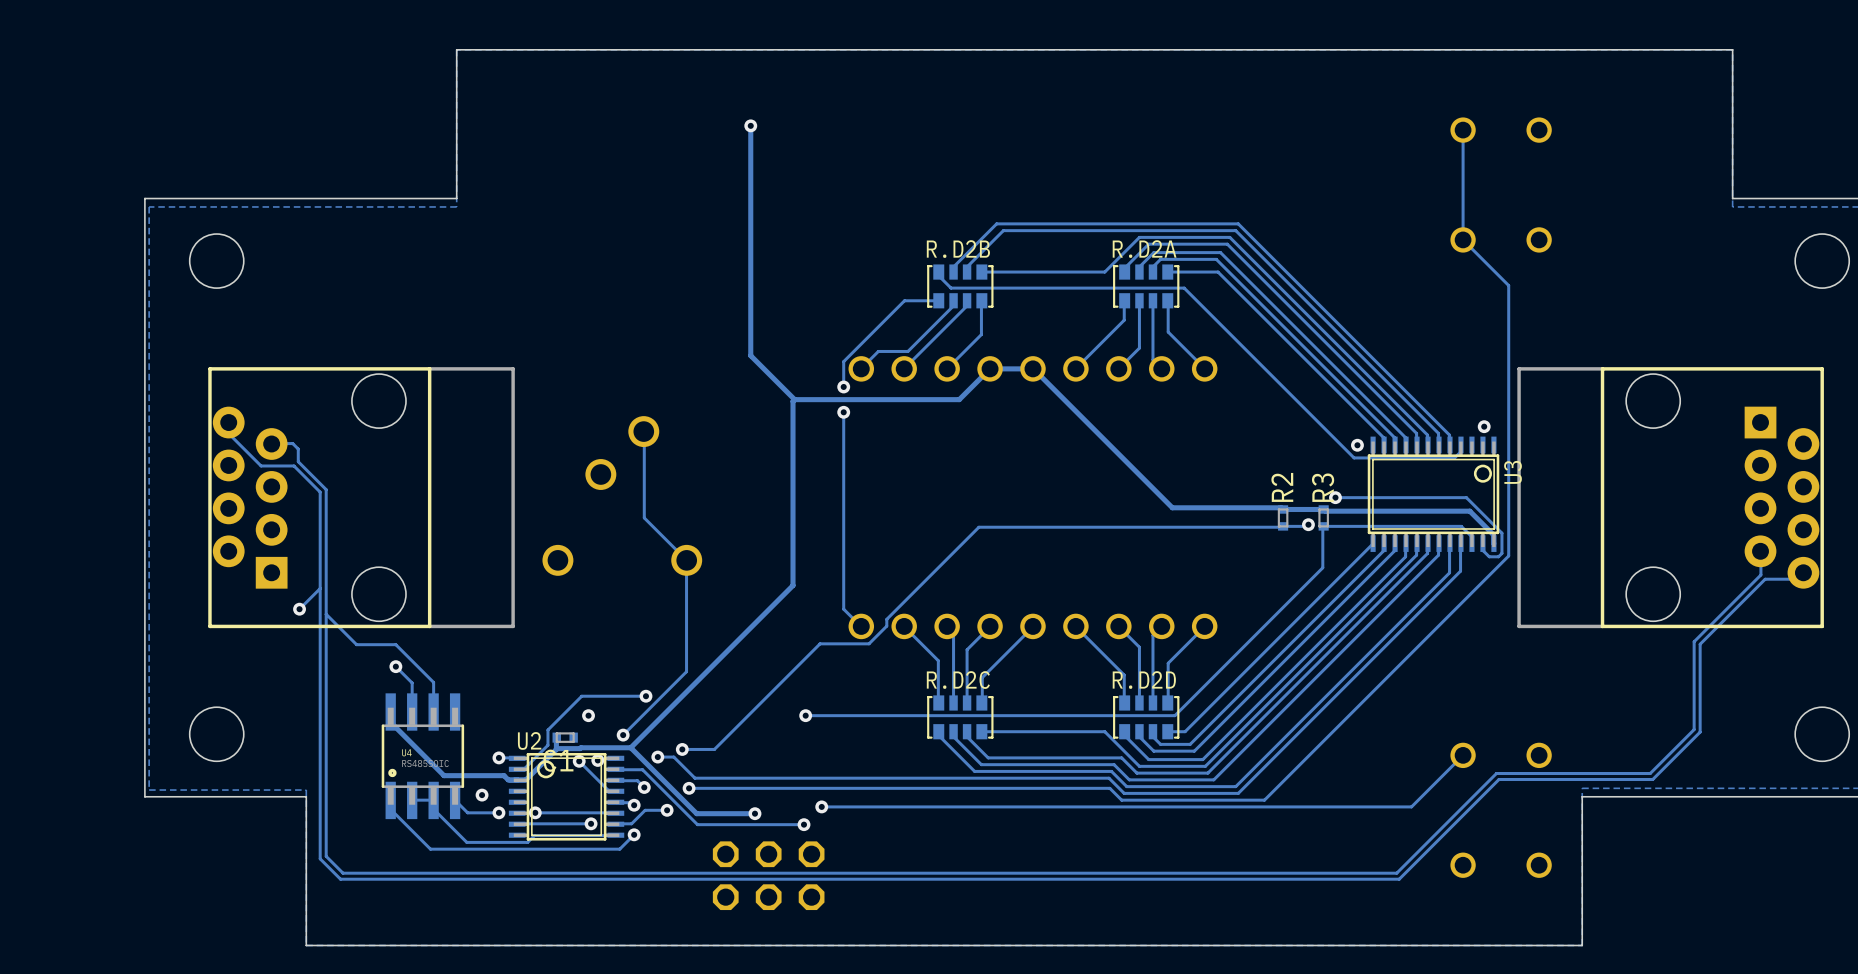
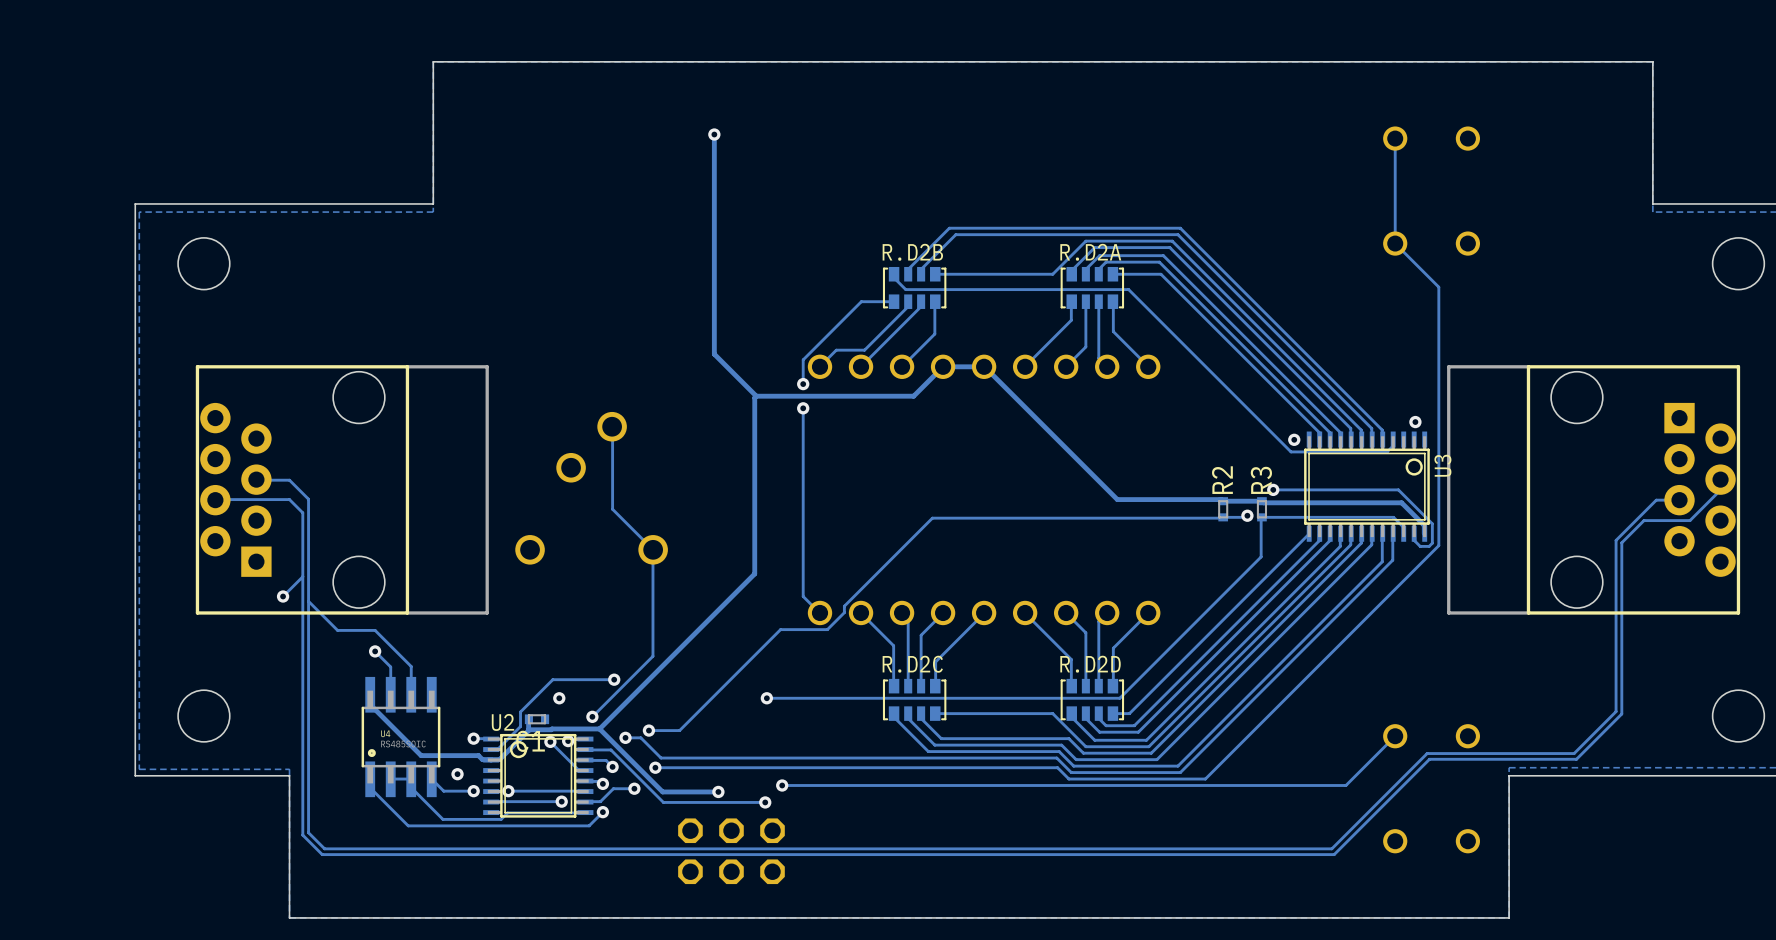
track: (228, 422) (228, 433) (261, 465) (294, 465) (320, 492) (320, 521) -> (215, 500) (289, 499) (302, 512)
track: (271, 444) (292, 443) (298, 449) (298, 461) (326, 489) (326, 507) -> (256, 479) (289, 480) (308, 499)
track: (1760, 551) (1760, 574) (1694, 641) -> (1679, 500) (1656, 500) (1616, 540) (1616, 627)
track: (1803, 572) (1797, 579) (1765, 579) (1700, 644) -> (1720, 479) (1720, 490) (1690, 520) (1644, 520) (1621, 542) (1621, 630)

